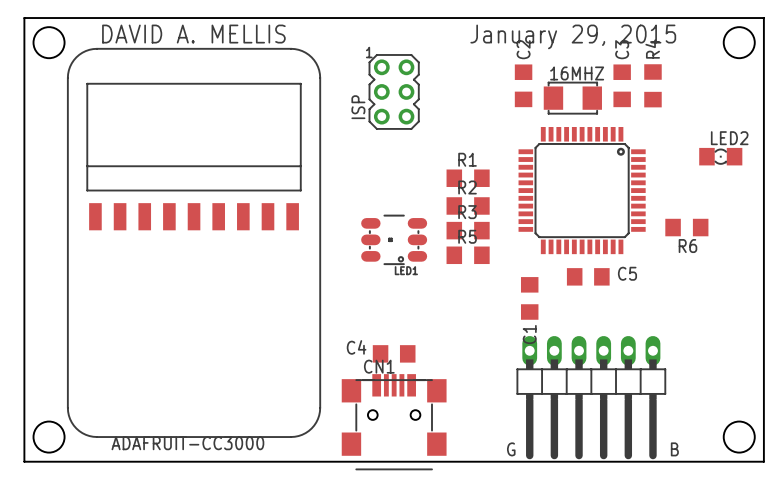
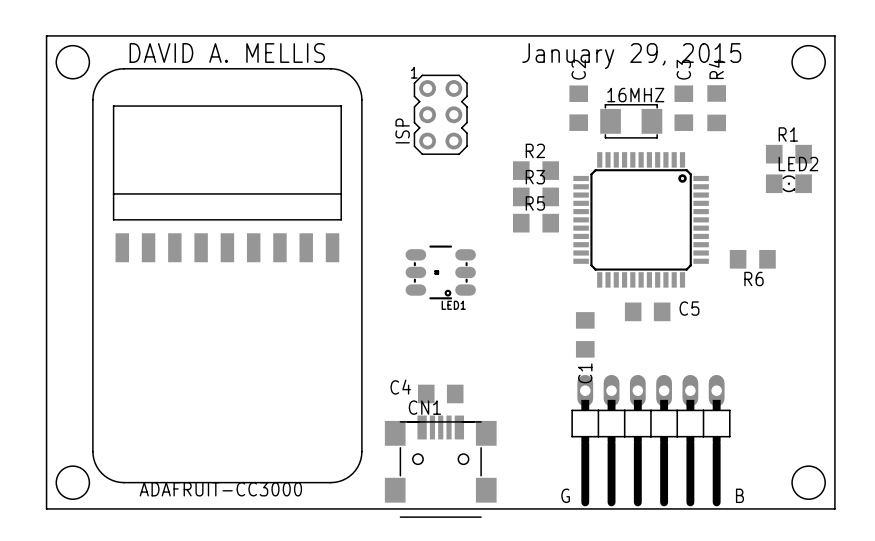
R1 position: (468, 178) -> (788, 154)
R2 position: (468, 205) -> (535, 170)
R3 position: (468, 230) -> (535, 196)
R5 position: (468, 255) -> (535, 223)

